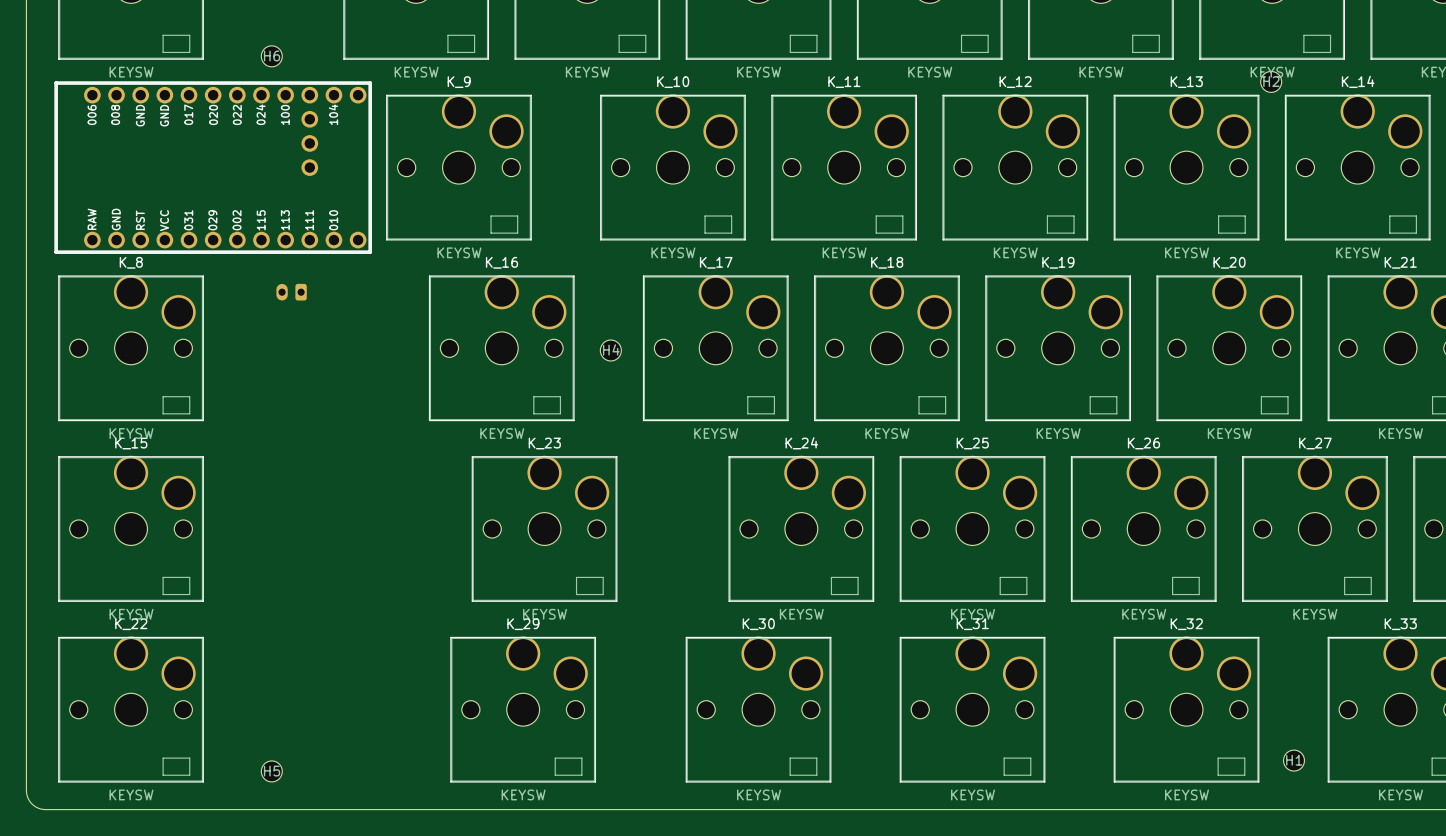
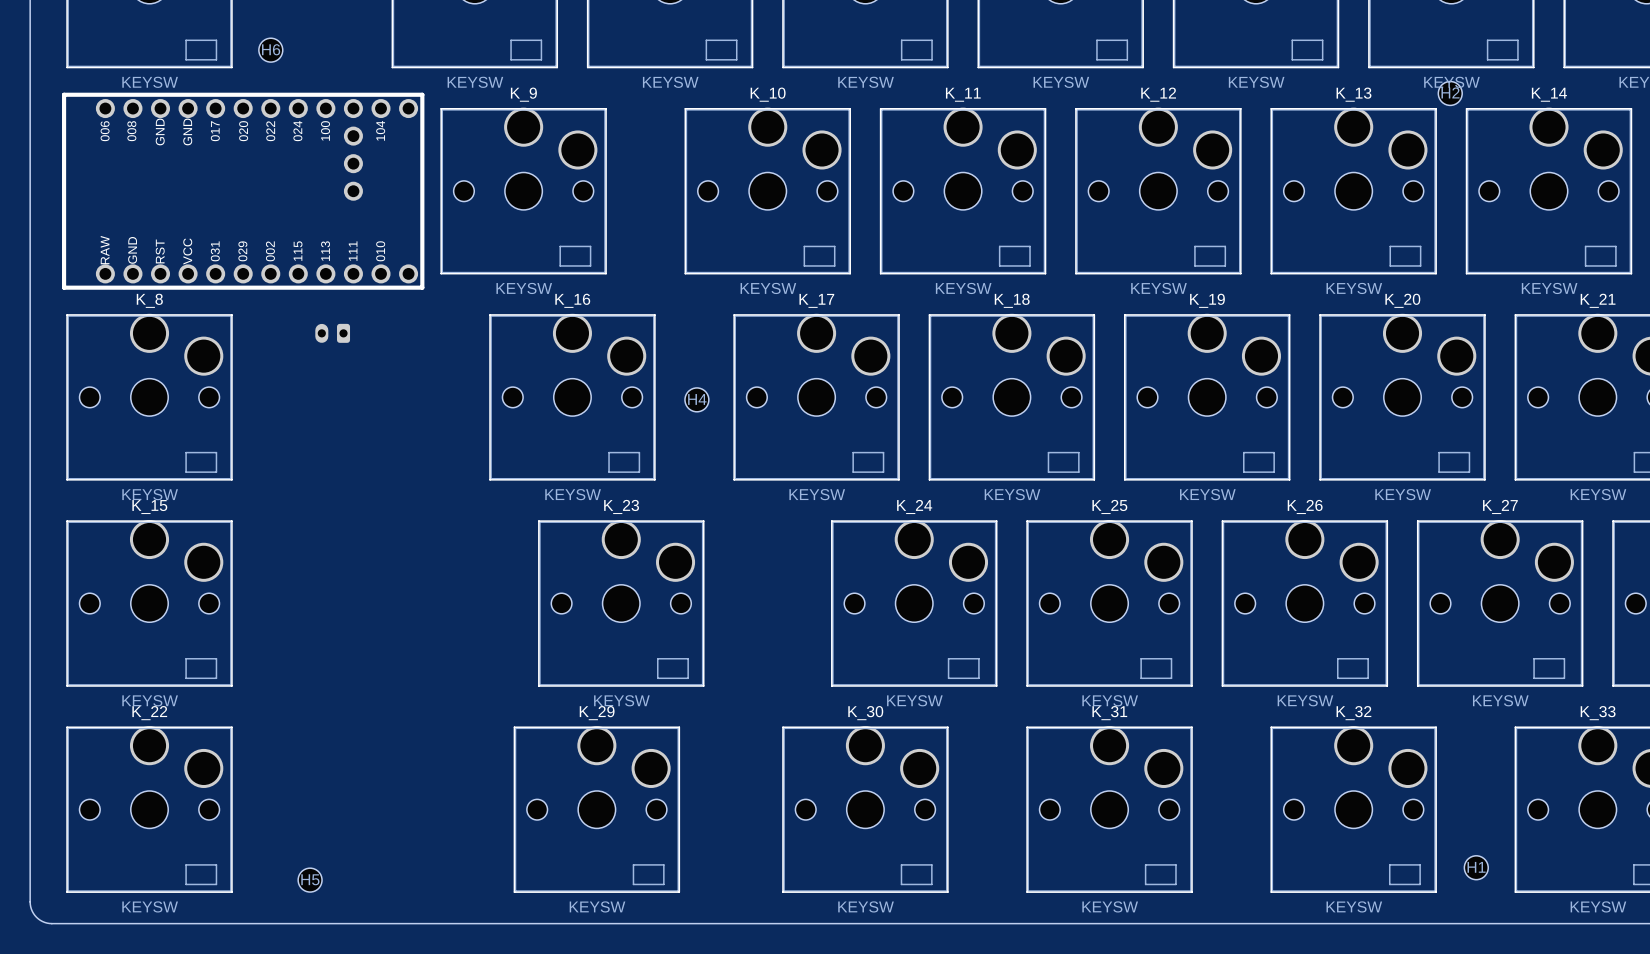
H6 position: (271, 56) -> (270, 50)

